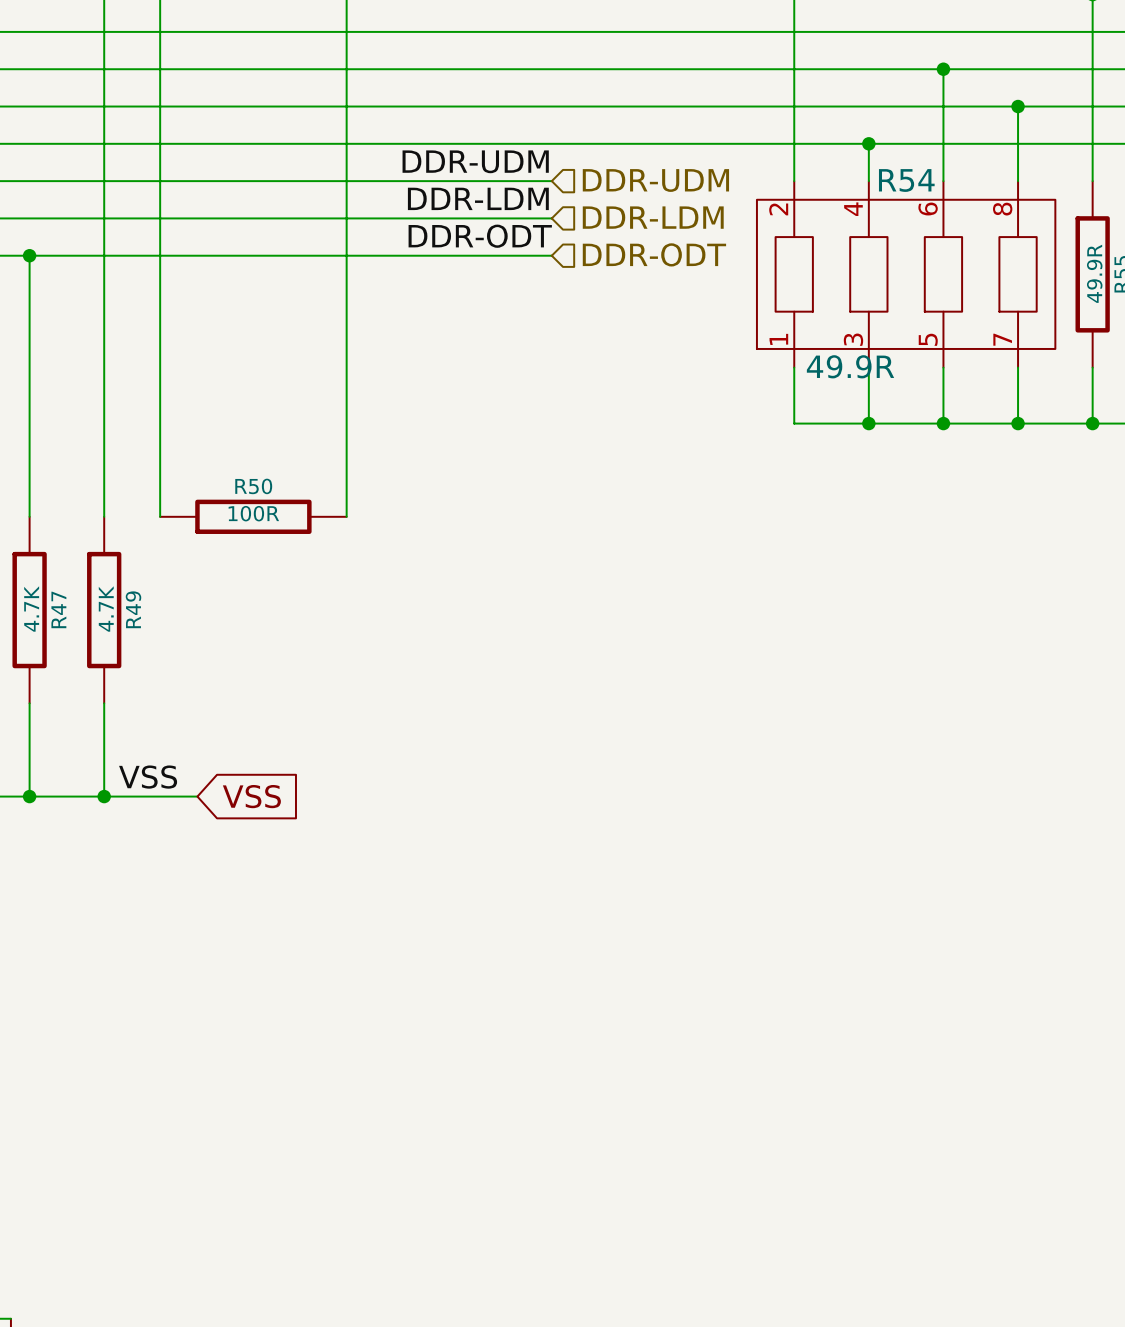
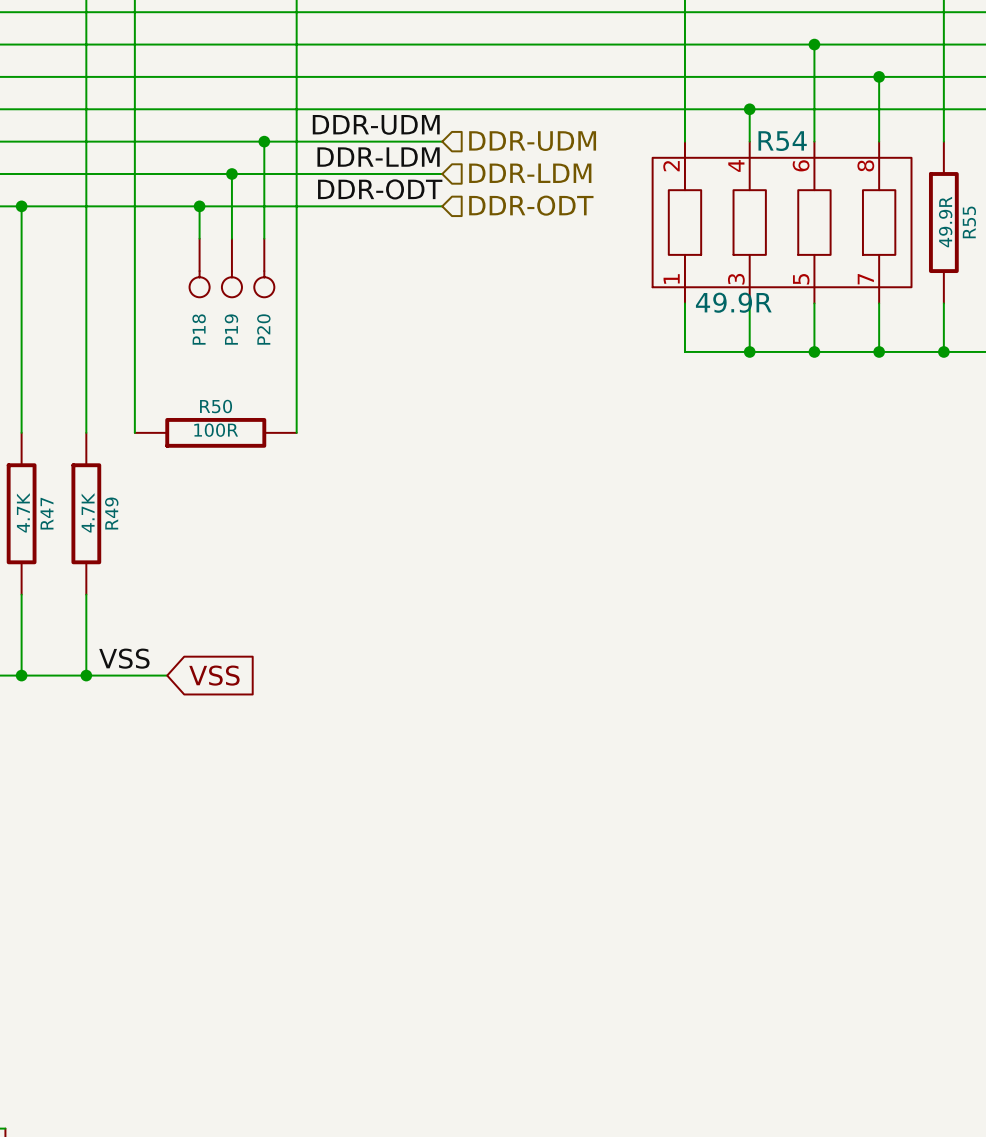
label position: DDR-UDM (475, 161) -> DDR-UDM (376, 124)
hierarchical label position: DDR-UDM (655, 180) -> DDR-UDM (532, 141)
wire: none -> (264, 141) (264, 238)
junction: none -> (264, 141)
wire: (514, 181) (551, 181) -> none
label position: DDR-LDM (478, 198) -> DDR-LDM (378, 157)
hierarchical label position: DDR-LDM (653, 217) -> DDR-LDM (530, 173)
wire: none -> (231, 173) (231, 238)
junction: none -> (231, 173)
wire: (514, 218) (551, 218) -> none
label position: DDR-ODT (480, 236) -> DDR-ODT (380, 189)
hierarchical label position: DDR-ODT (654, 254) -> DDR-ODT (531, 205)
wire: none -> (199, 206) (199, 238)
junction: none -> (199, 206)
wire: (514, 255) (551, 255) -> none
P18: none -> (199, 268)
P19: none -> (231, 268)
P20: none -> (264, 268)

